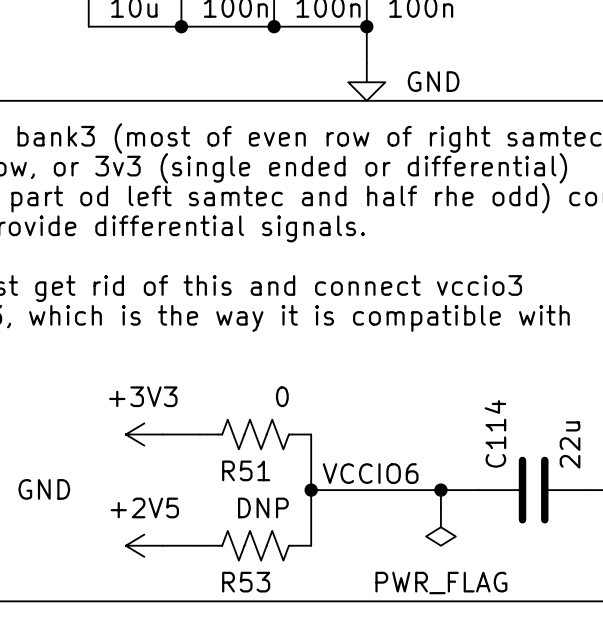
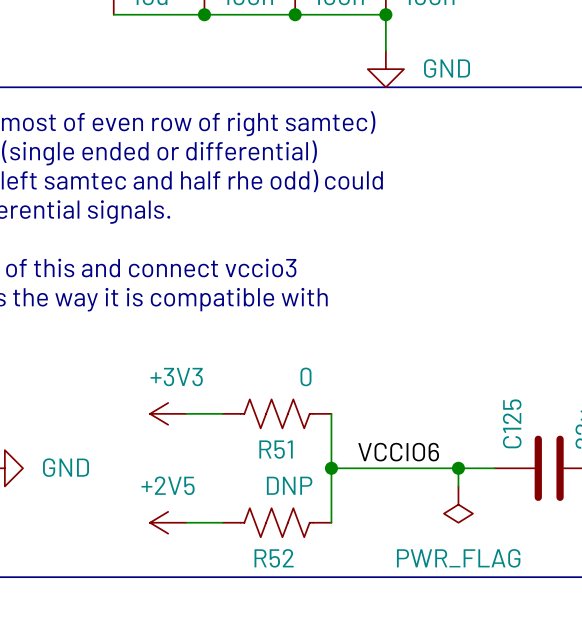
C114 name: C114 (495, 433) -> C125 (512, 423)
R53 name: R53 (246, 582) -> R52 (274, 558)

